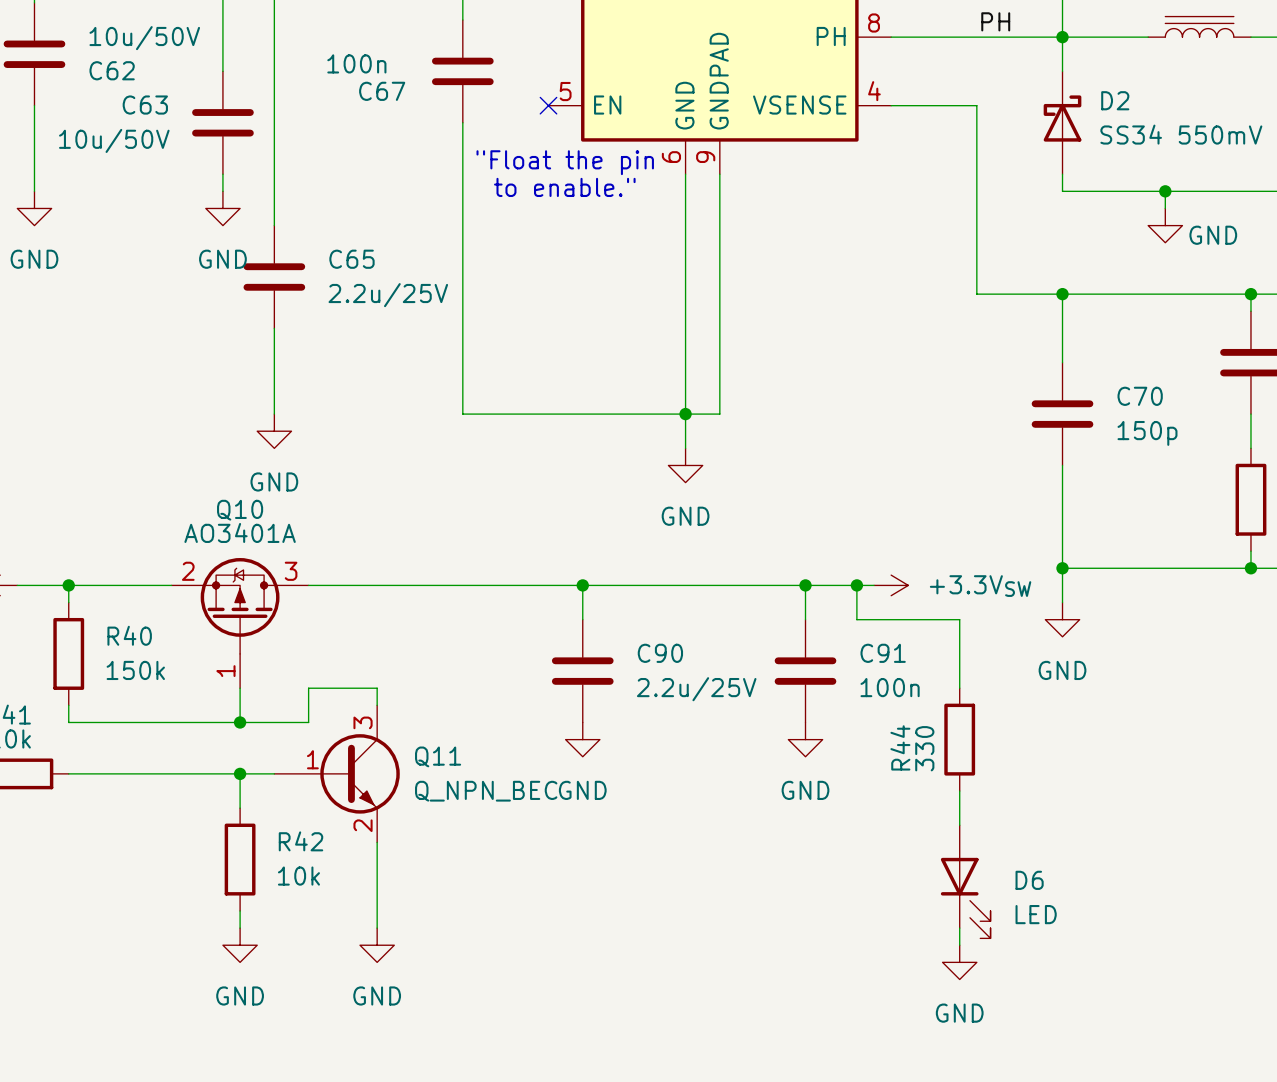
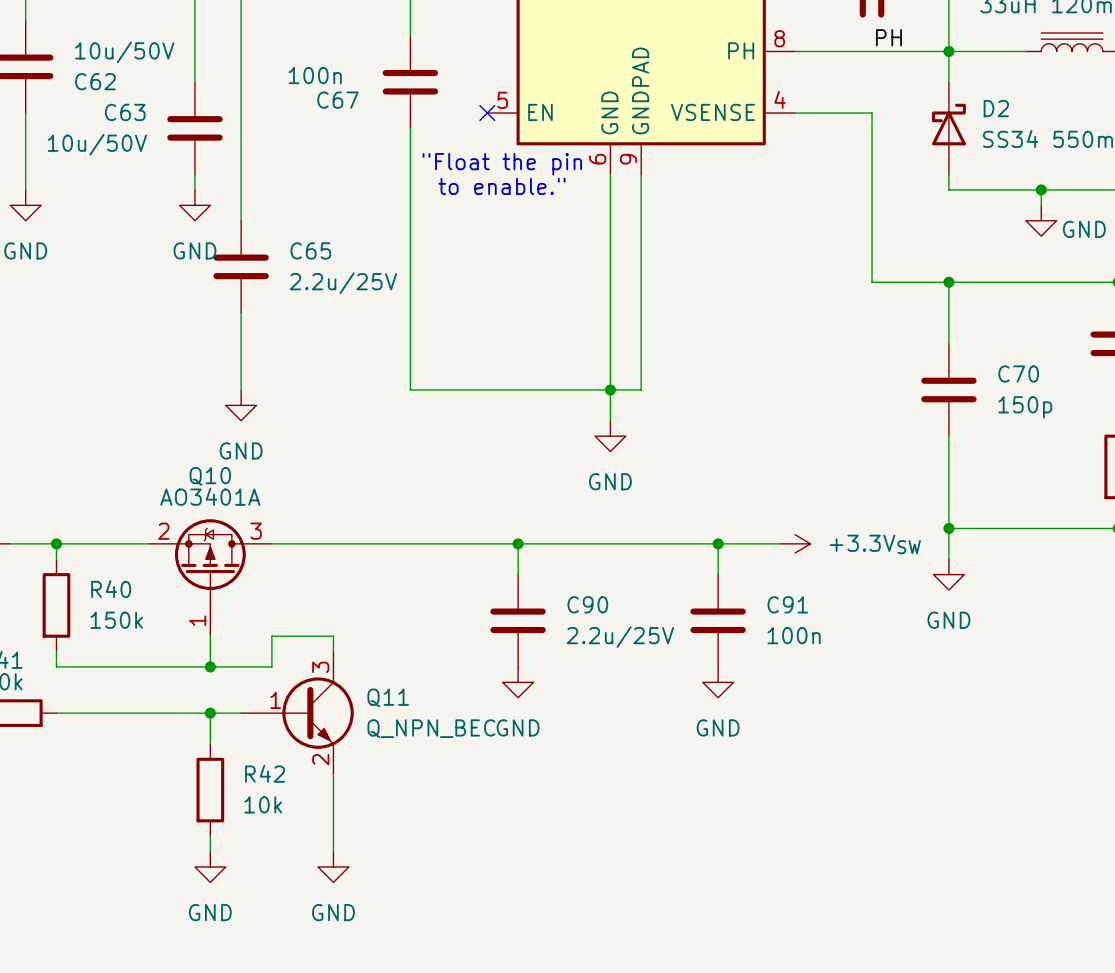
wire: (856, 585) (856, 619) (959, 619) (959, 688) -> none
junction: (856, 585) -> none
R44: 330 (959, 739) -> none
wire: (959, 791) (959, 825) -> none
D6: LED (965, 881) -> none
wire: (959, 928) (959, 945) -> none
power symbol: GND (959, 962) -> none

